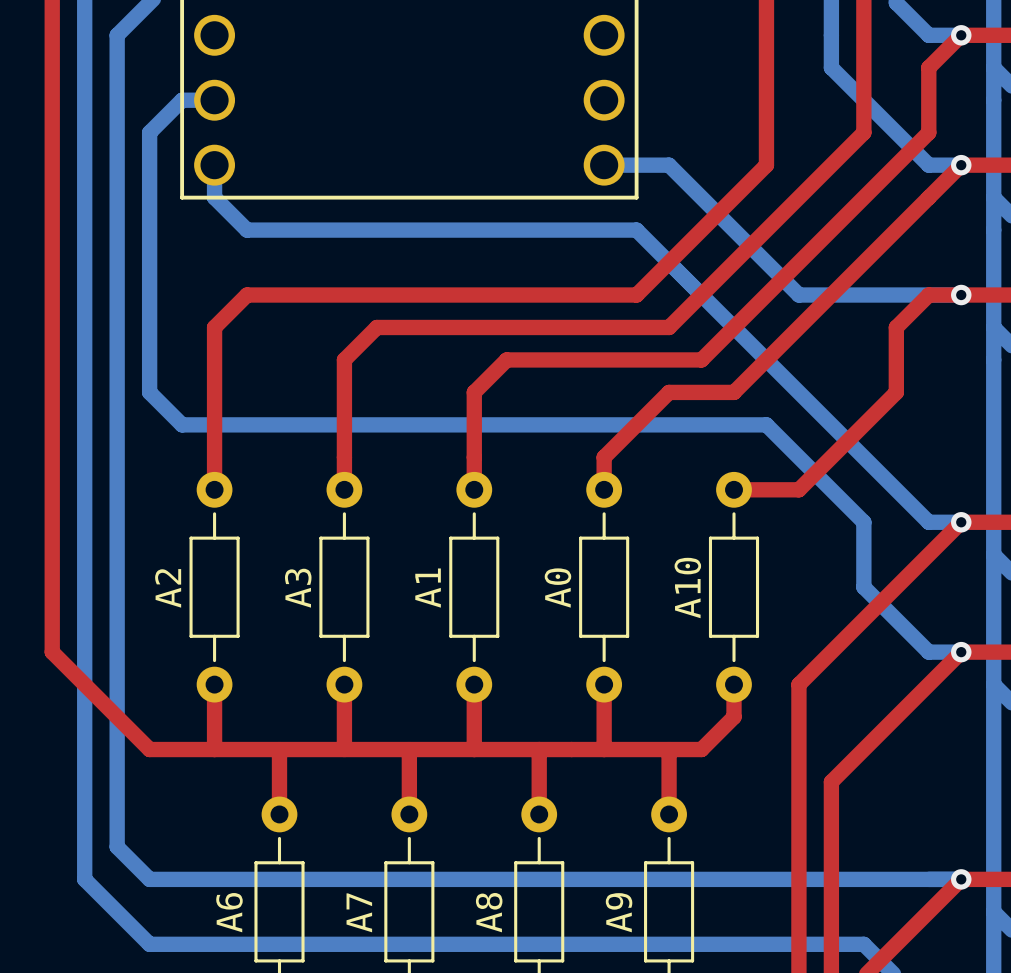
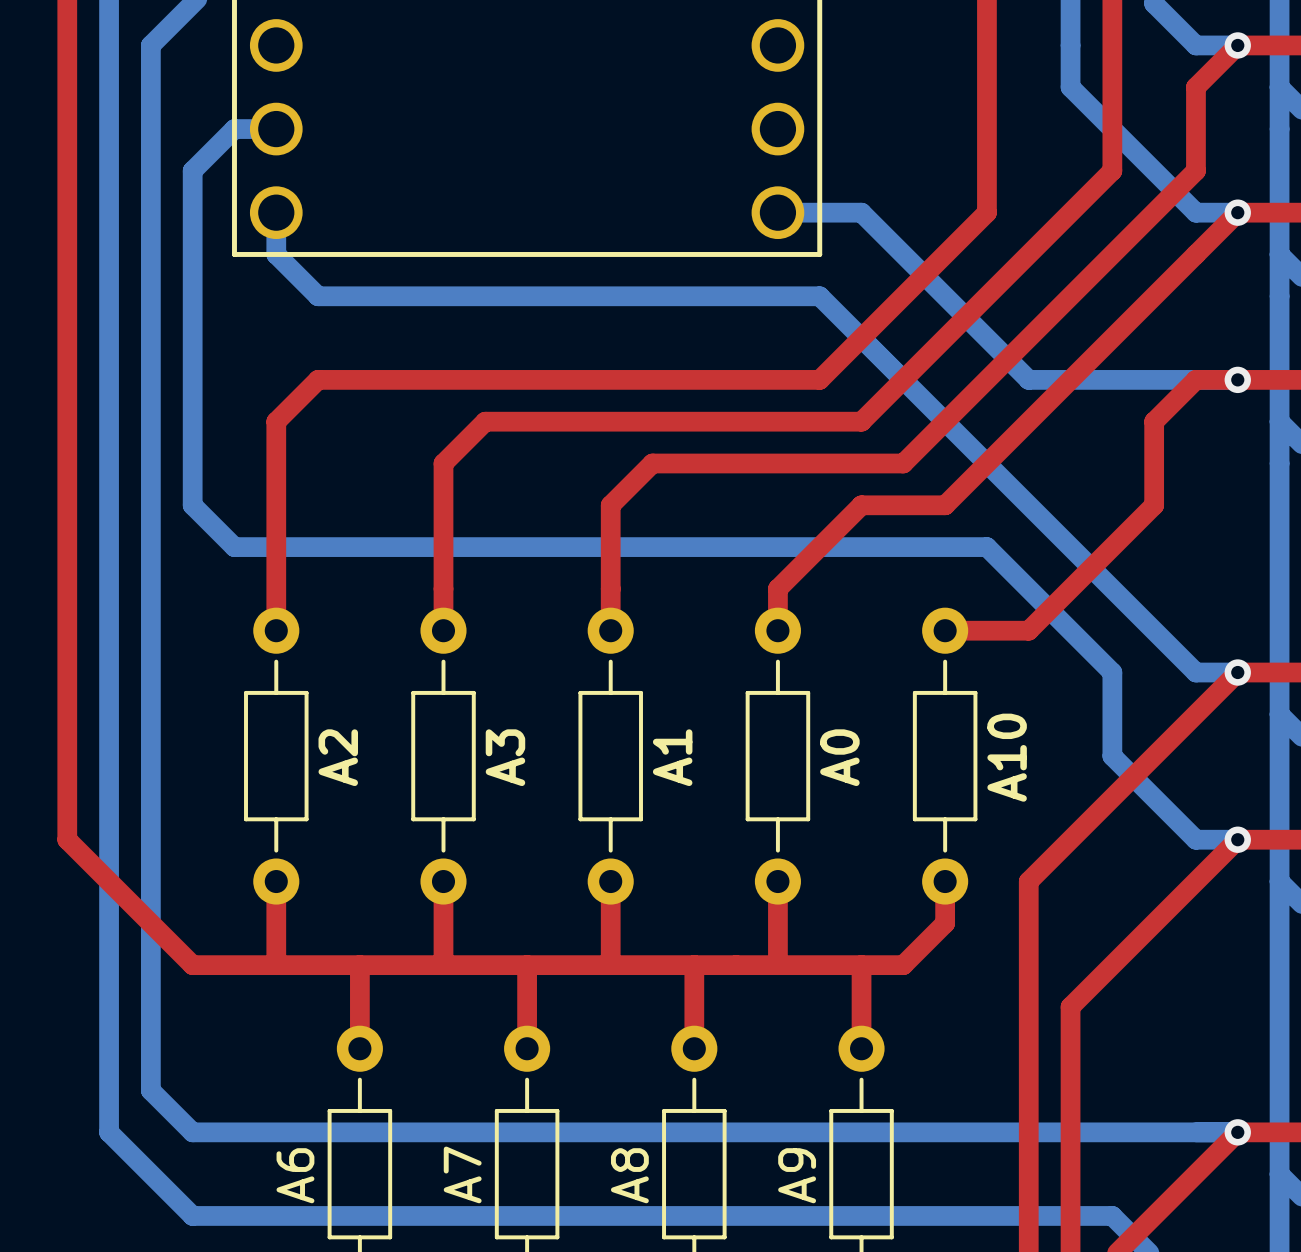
A2 name position: A2 (168, 588) -> A2 (338, 757)
A3 name position: A3 (298, 588) -> A3 (505, 757)
A1 name position: A1 (428, 588) -> A1 (672, 757)
A0 name position: A0 (557, 588) -> A0 (839, 757)
A10 name position: A10 (687, 588) -> A10 (1007, 757)

